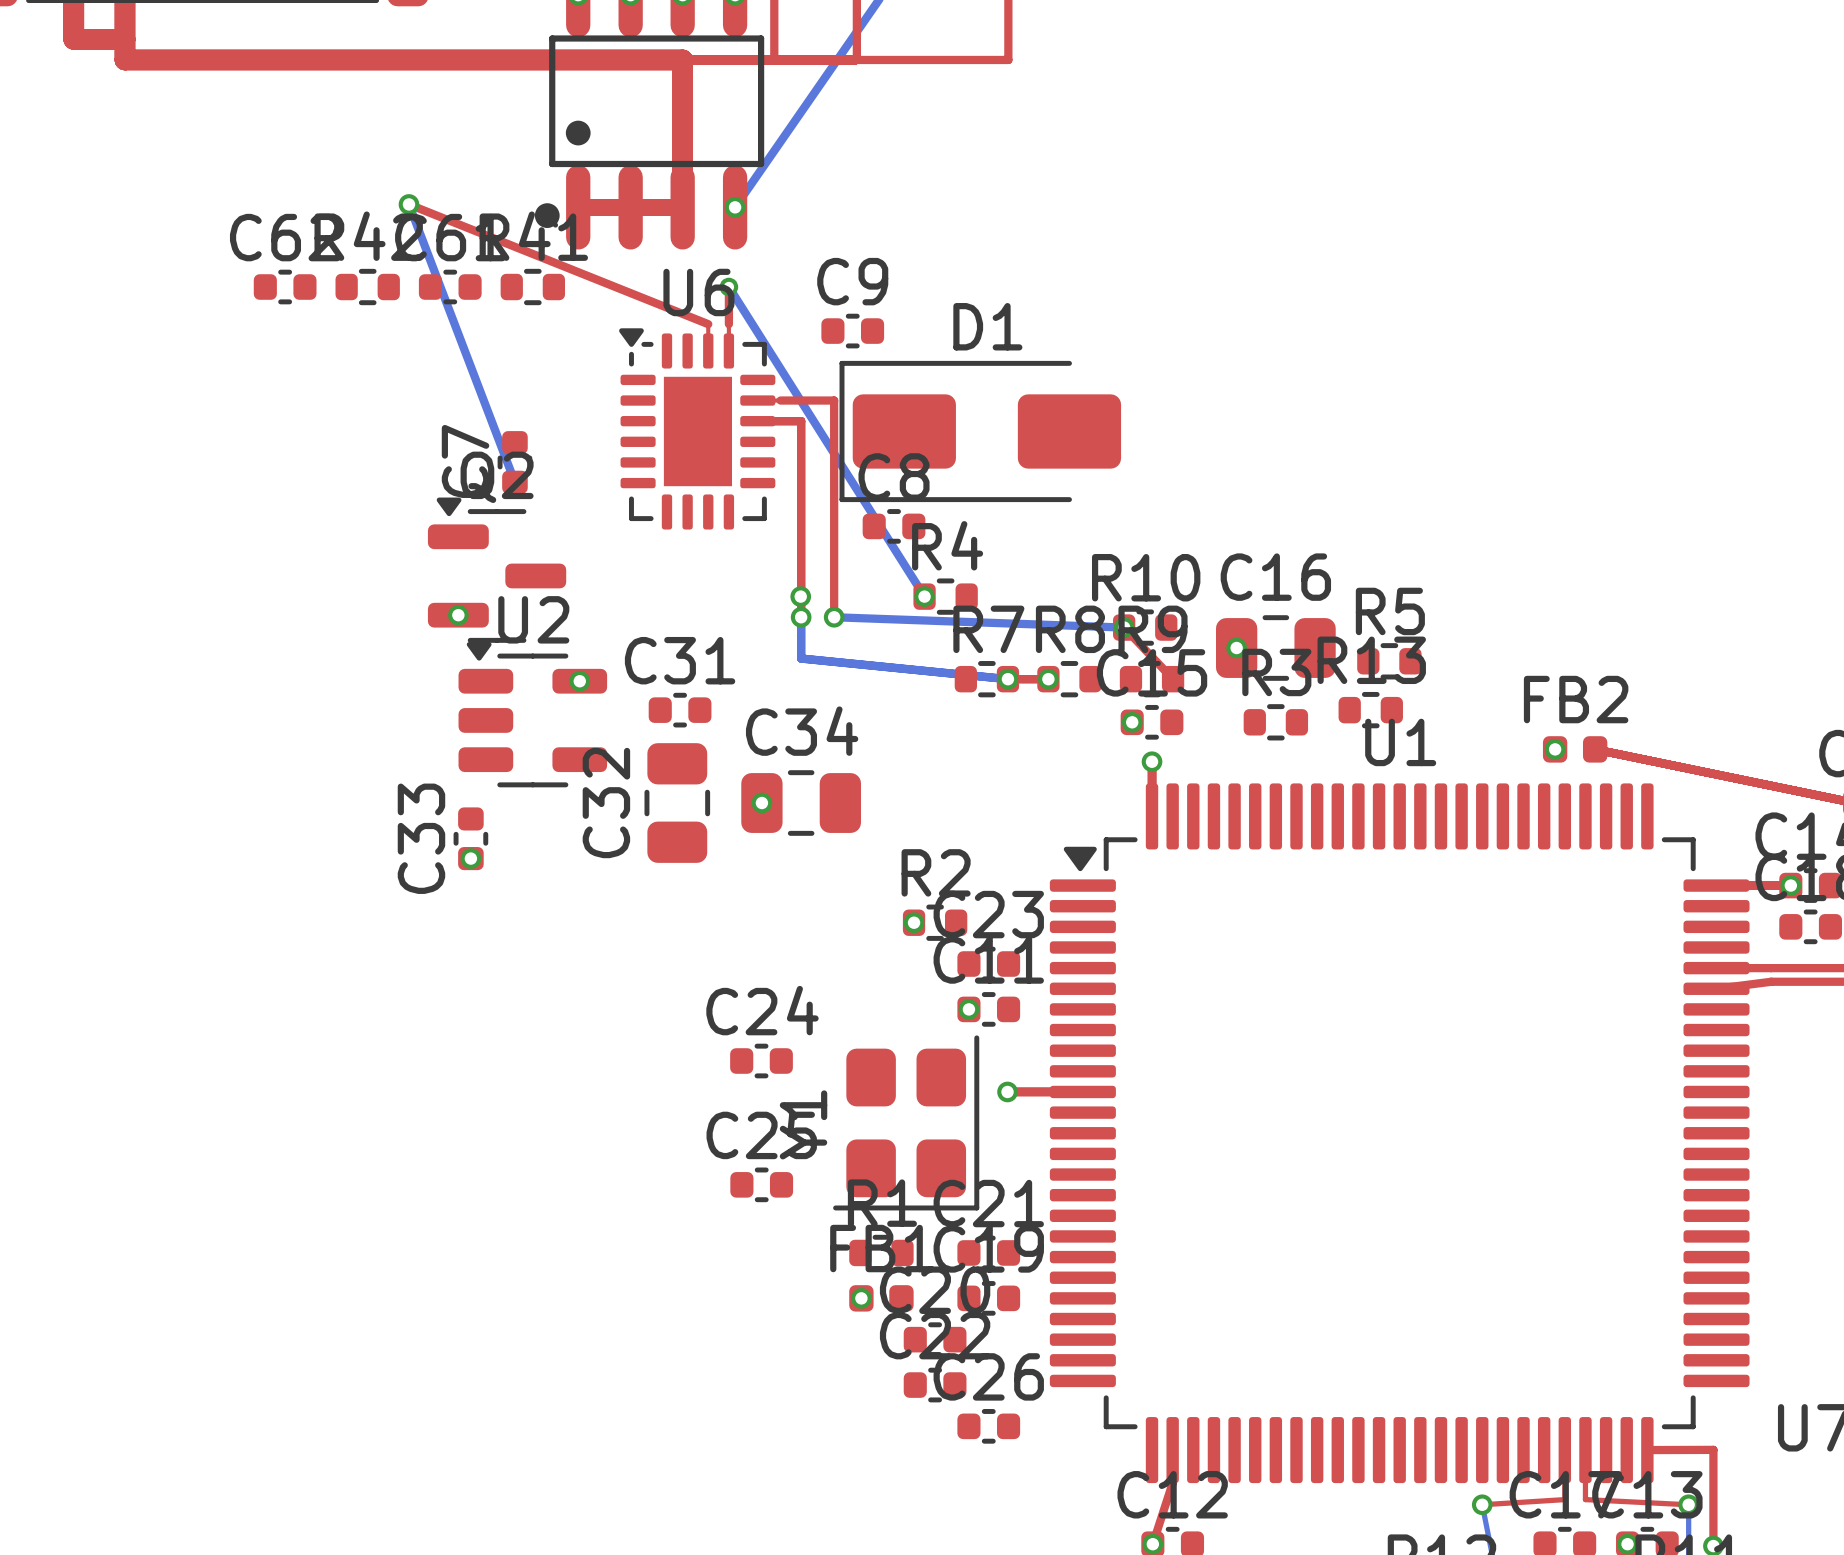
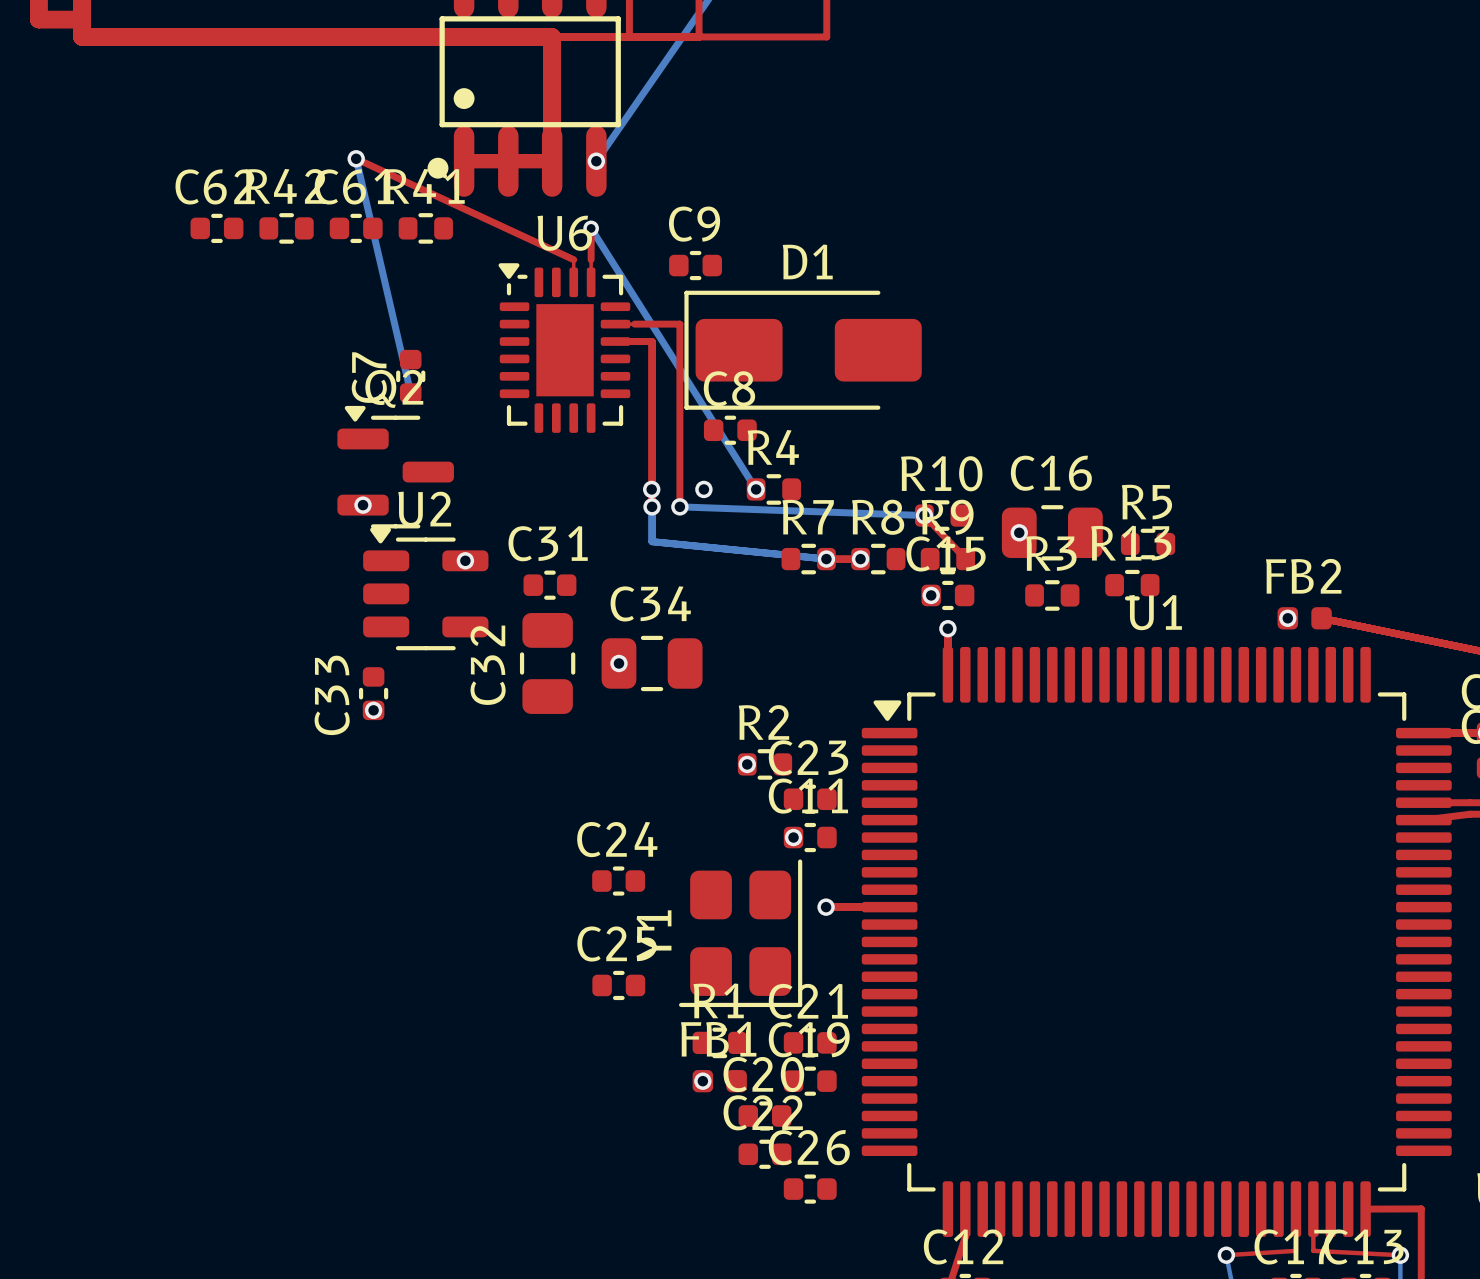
top track: (408, 204) (708, 324) -> (356, 158) (573, 259)
bottom track: (408, 204) (514, 482) -> (356, 158) (410, 393)
via position: (408, 204) -> (356, 158)
via: none -> (703, 489)

